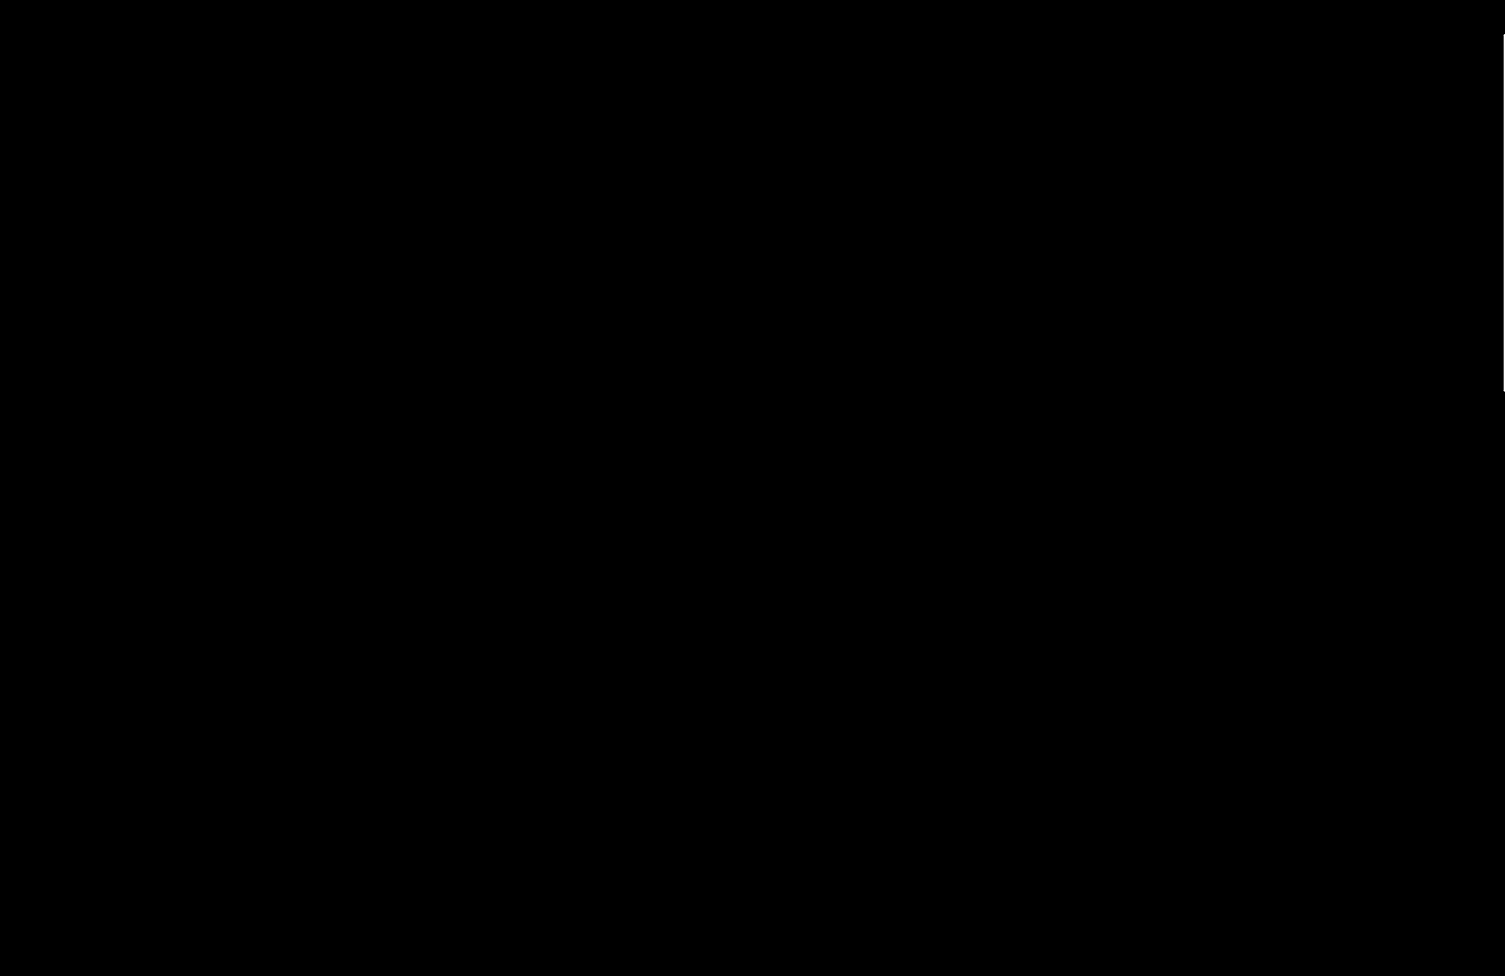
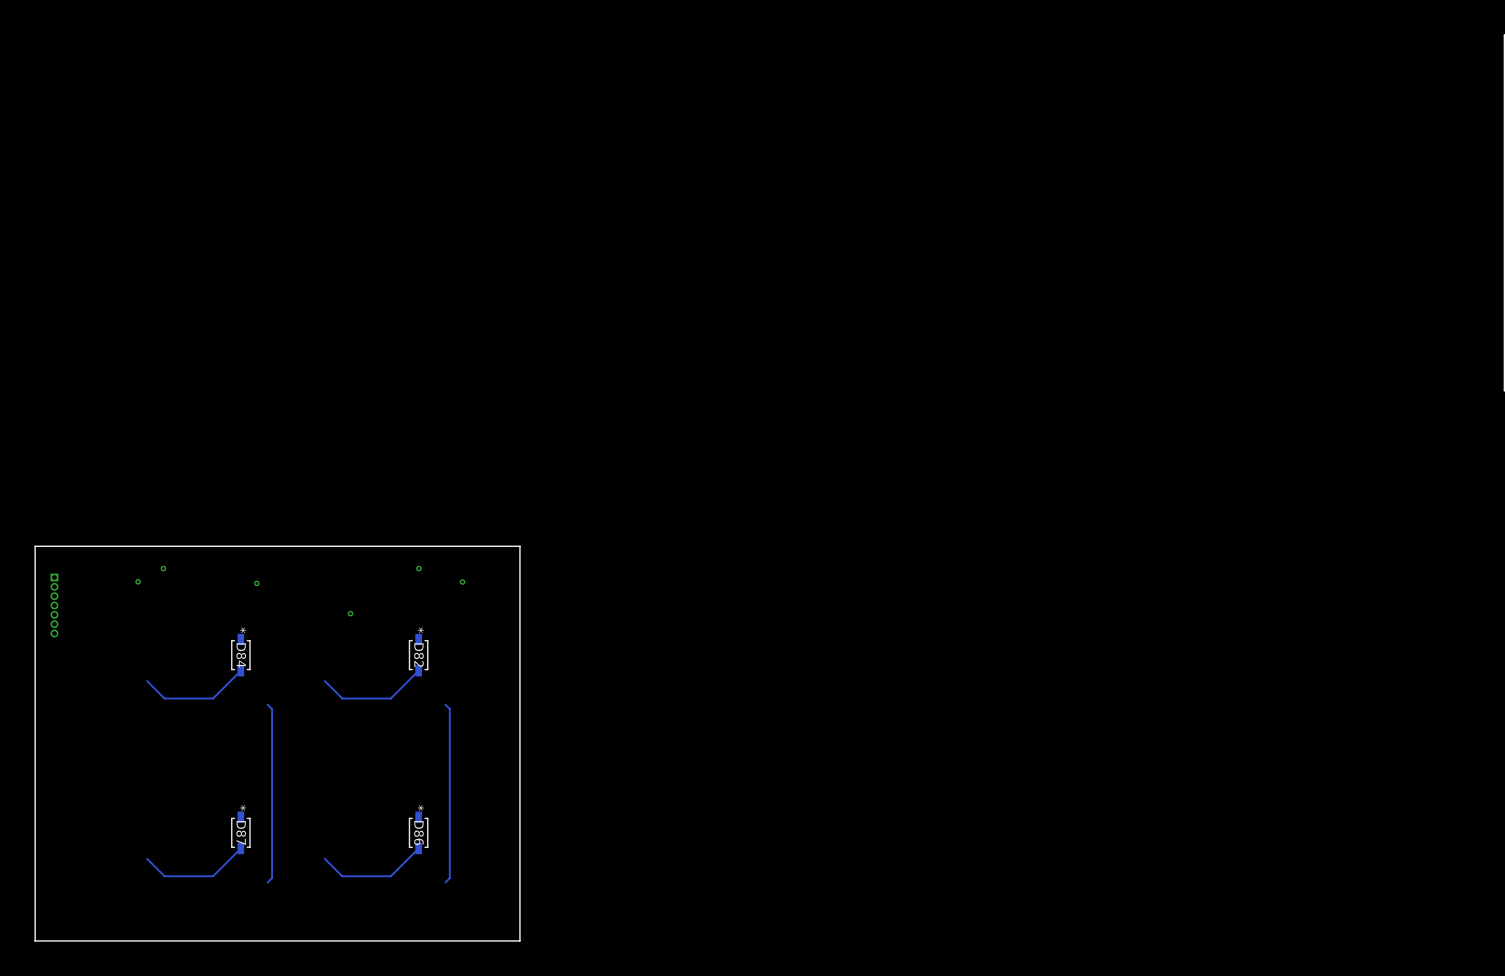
board edge: none -> (519, 546) (35, 546) (35, 940) (519, 940) (519, 546)
via: none -> (163, 568)
via: none -> (418, 568)
via: none -> (138, 581)
via: none -> (462, 581)
via: none -> (256, 583)
part: none -> (54, 605)
via: none -> (350, 613)
D84: none -> (240, 655)
D82: none -> (418, 655)
track: none -> (240, 670) (213, 698) (164, 698) (147, 681)
track: none -> (418, 670) (390, 698) (342, 698) (324, 681)
track: none -> (267, 704) (272, 709) (272, 878) (267, 882)
track: none -> (445, 704) (449, 709) (449, 878) (445, 882)
D87: none -> (240, 832)
D86: none -> (418, 832)
track: none -> (240, 848) (213, 876) (164, 876) (147, 858)
track: none -> (418, 848) (390, 876) (342, 876) (324, 858)

